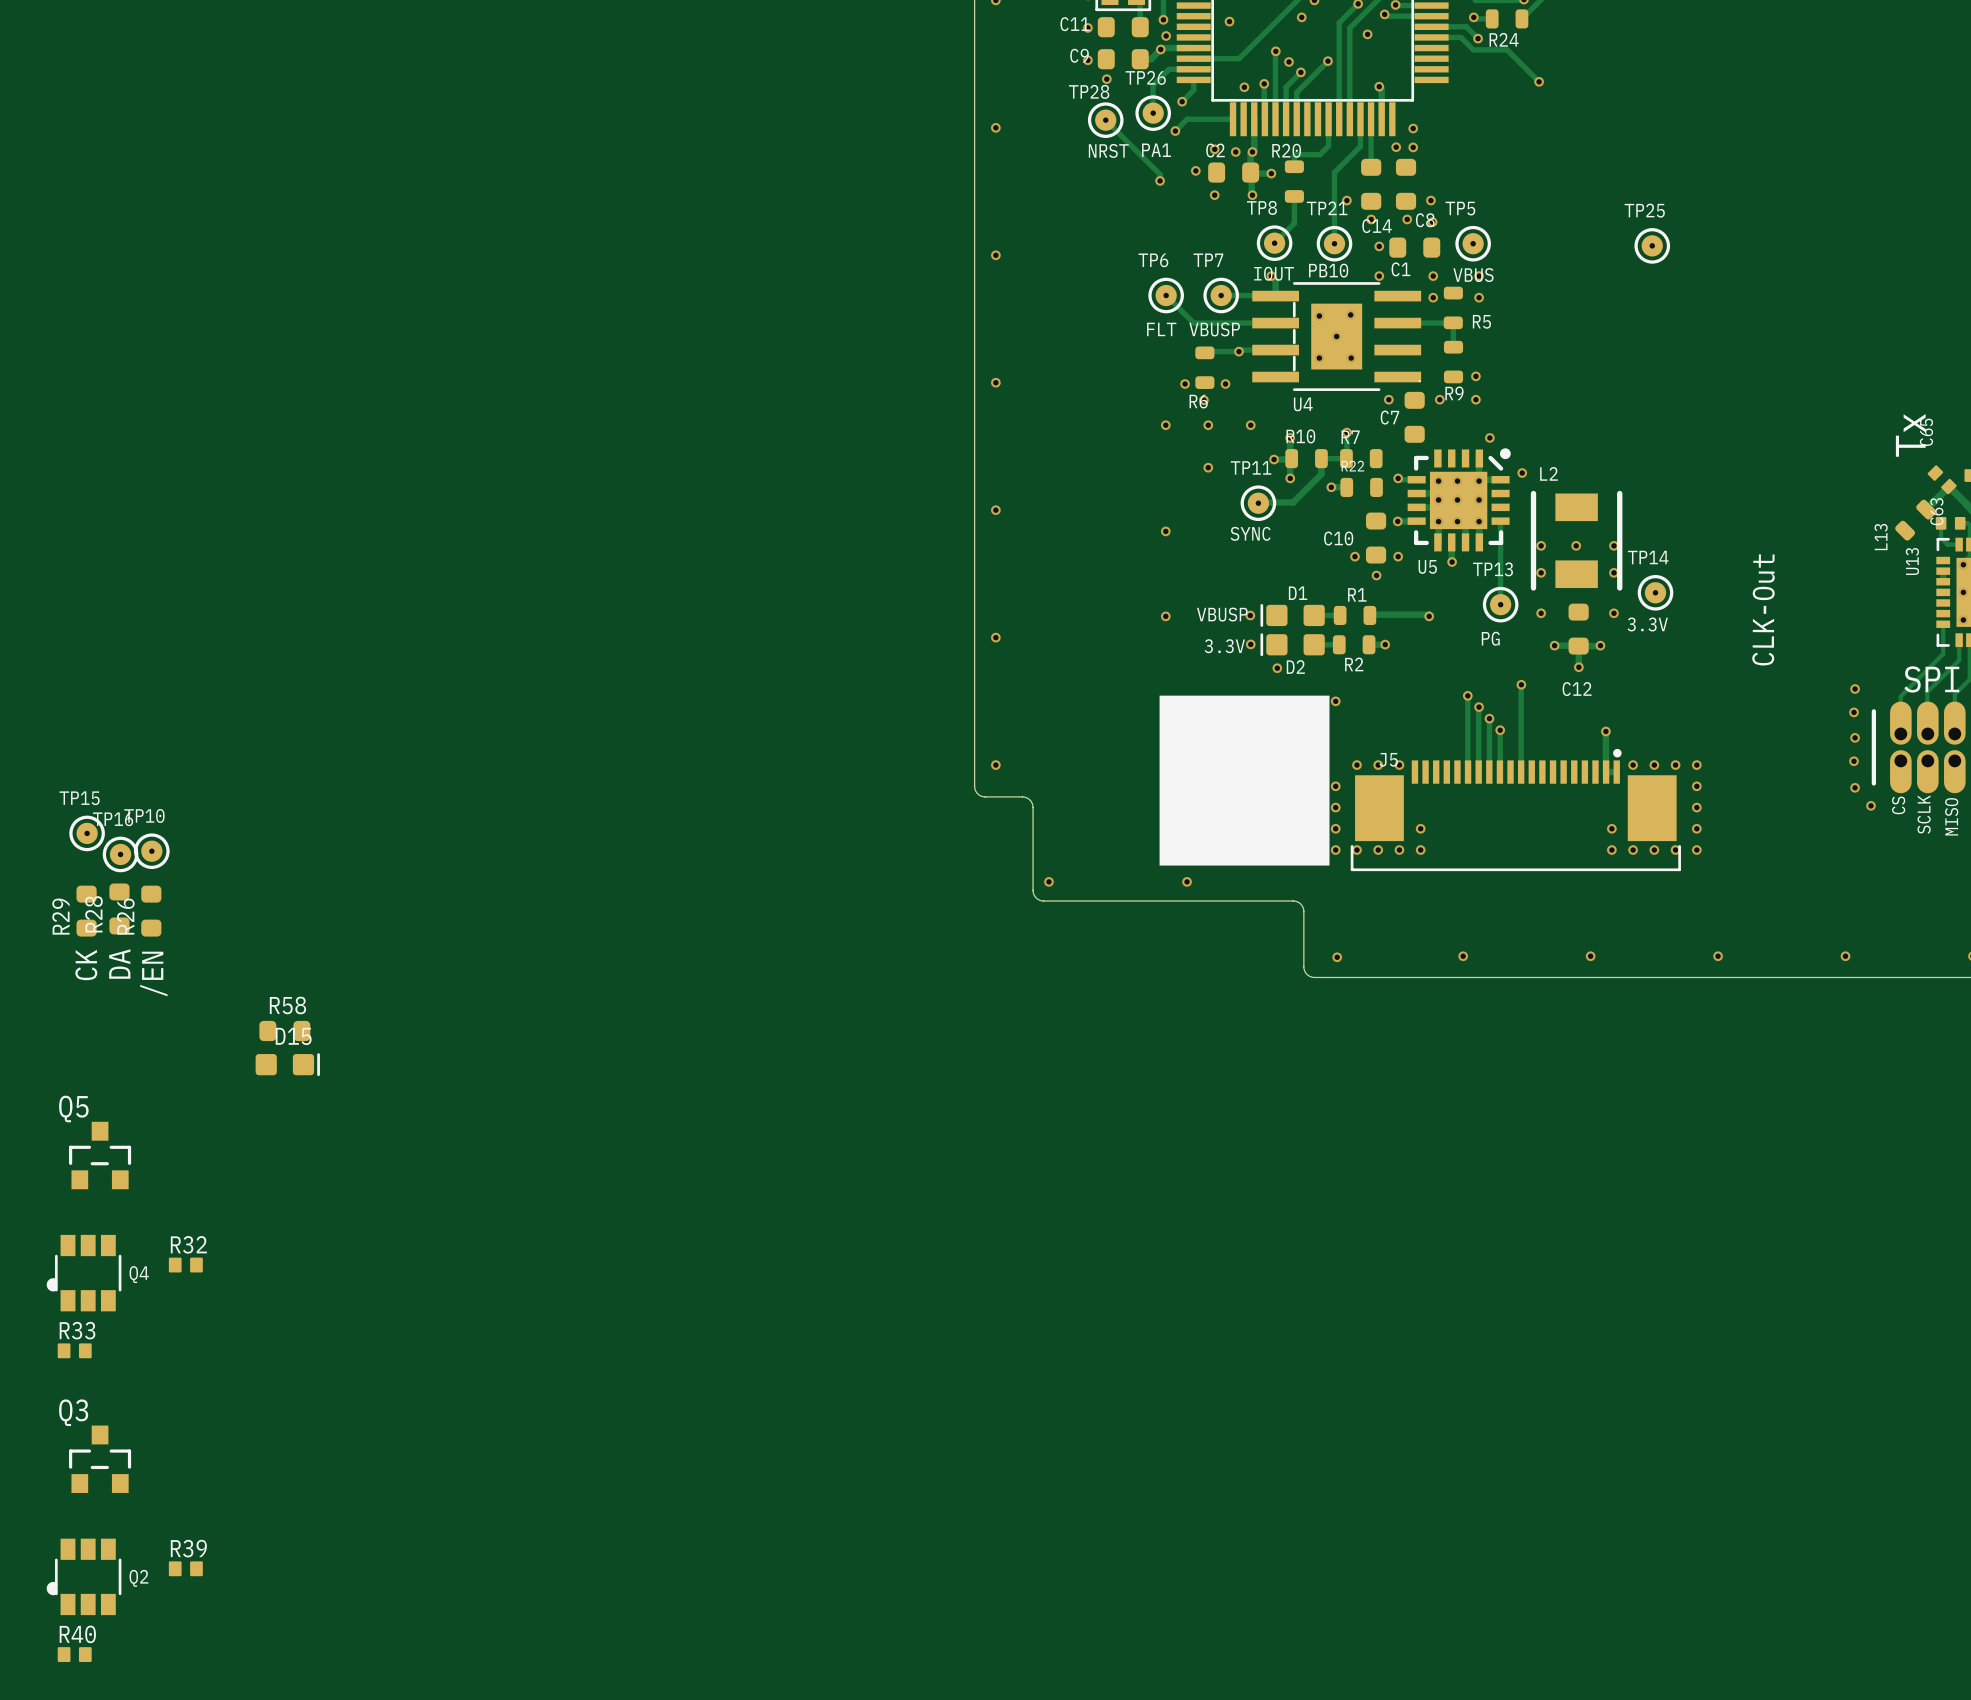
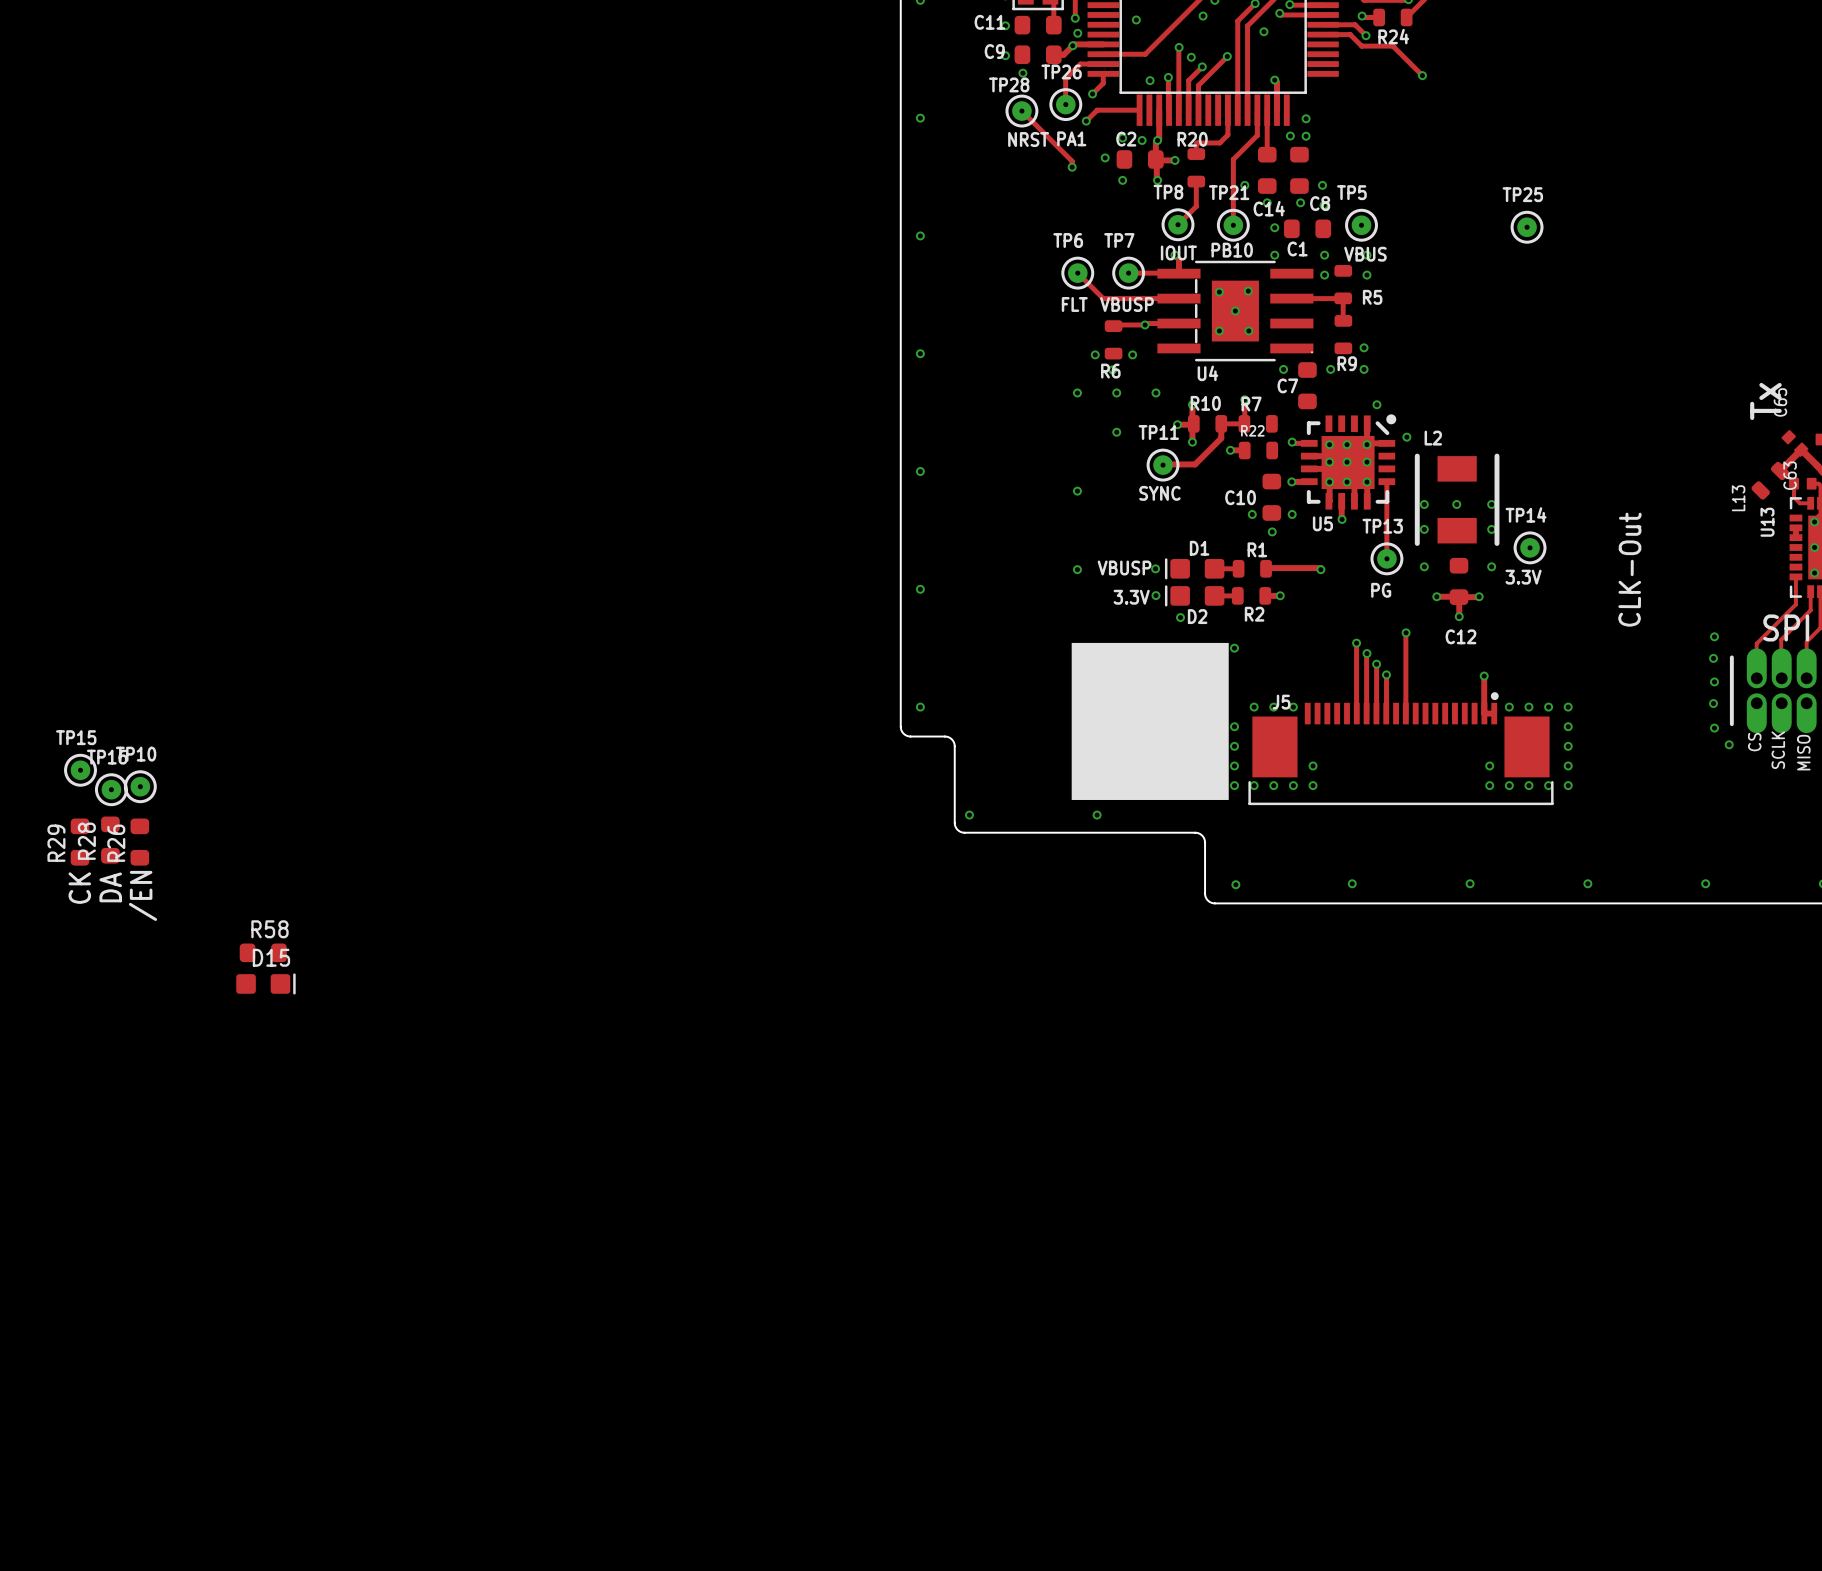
Q5: (100, 1155) -> none
R32: (185, 1265) -> none
Q4: (84, 1273) -> none
R33: (74, 1350) -> none
Q3: (100, 1459) -> none
R39: (185, 1568) -> none
Q2: (84, 1576) -> none
R40: (74, 1654) -> none

